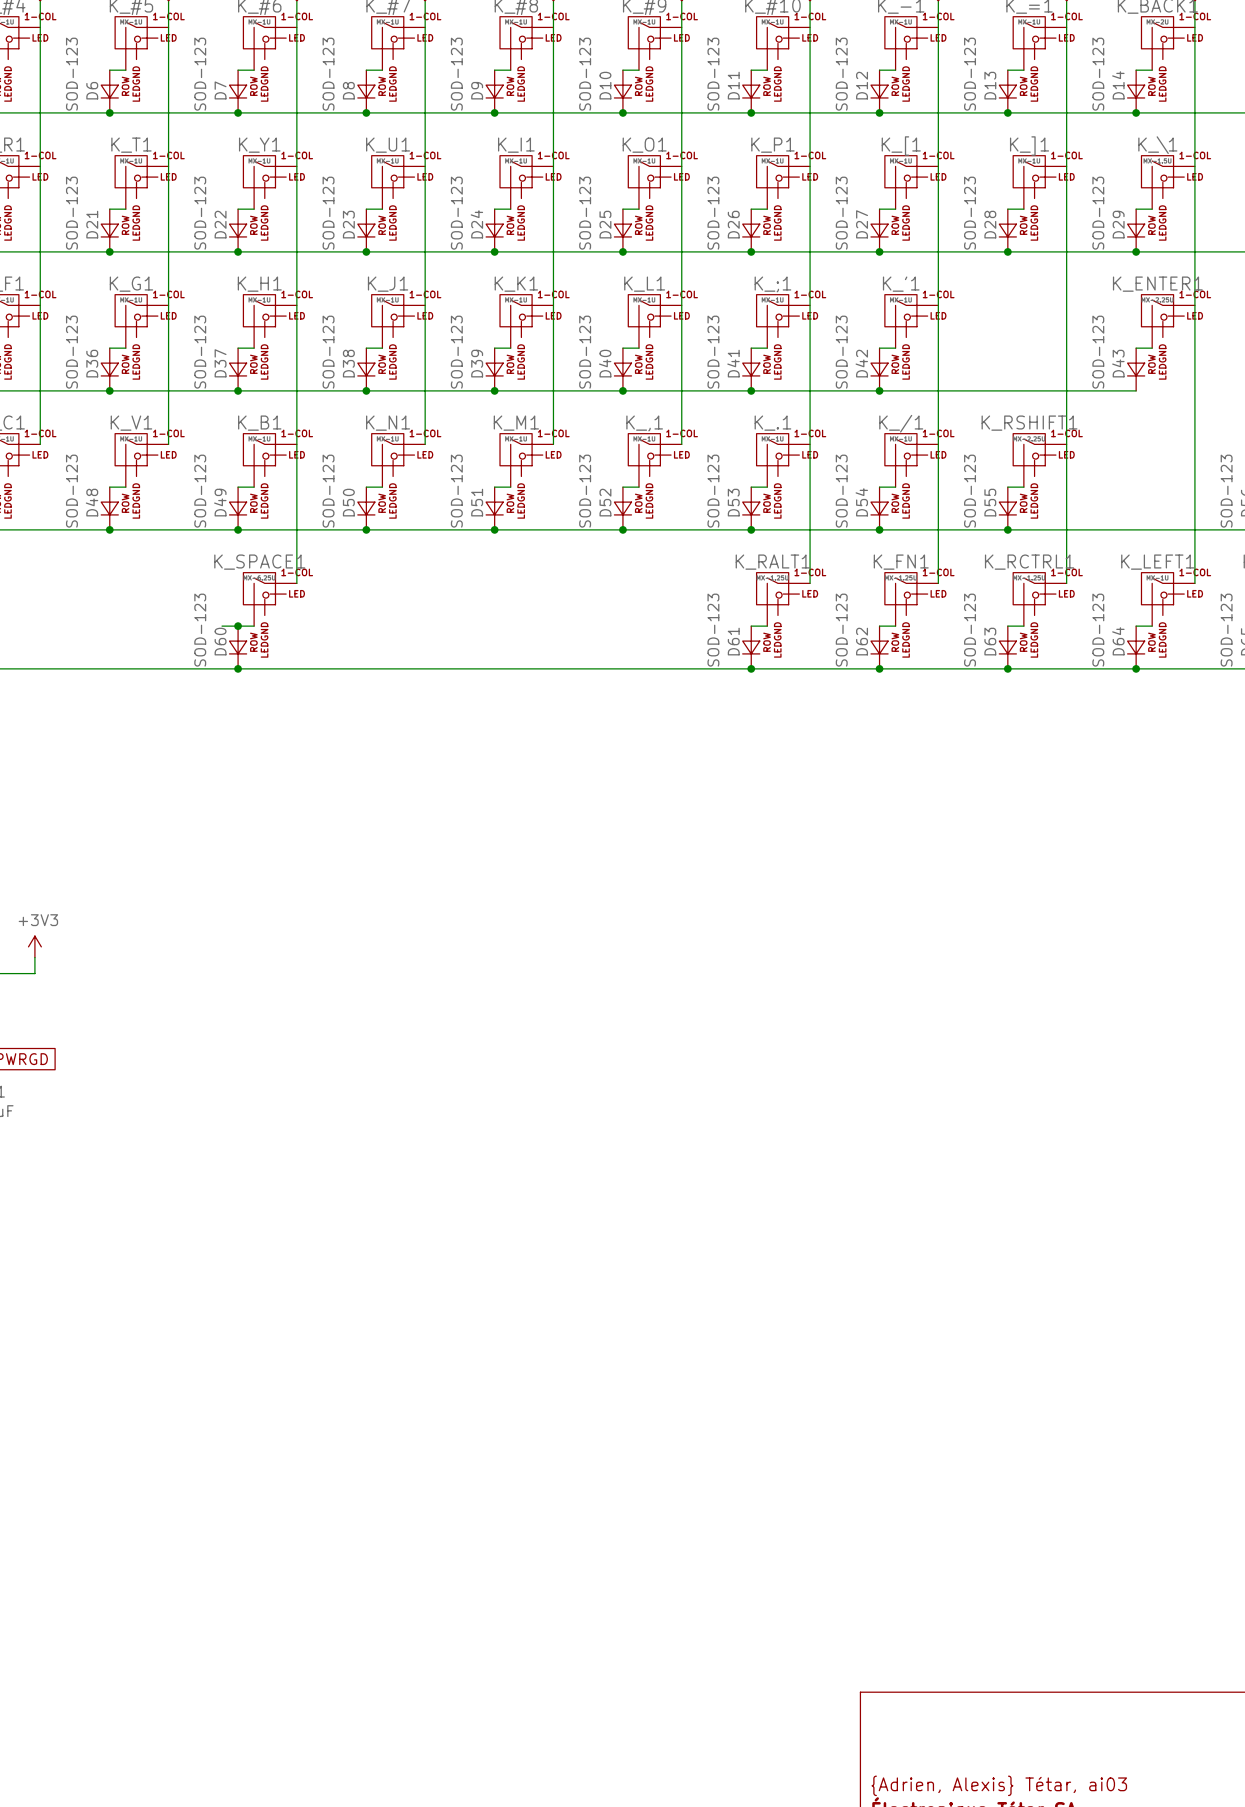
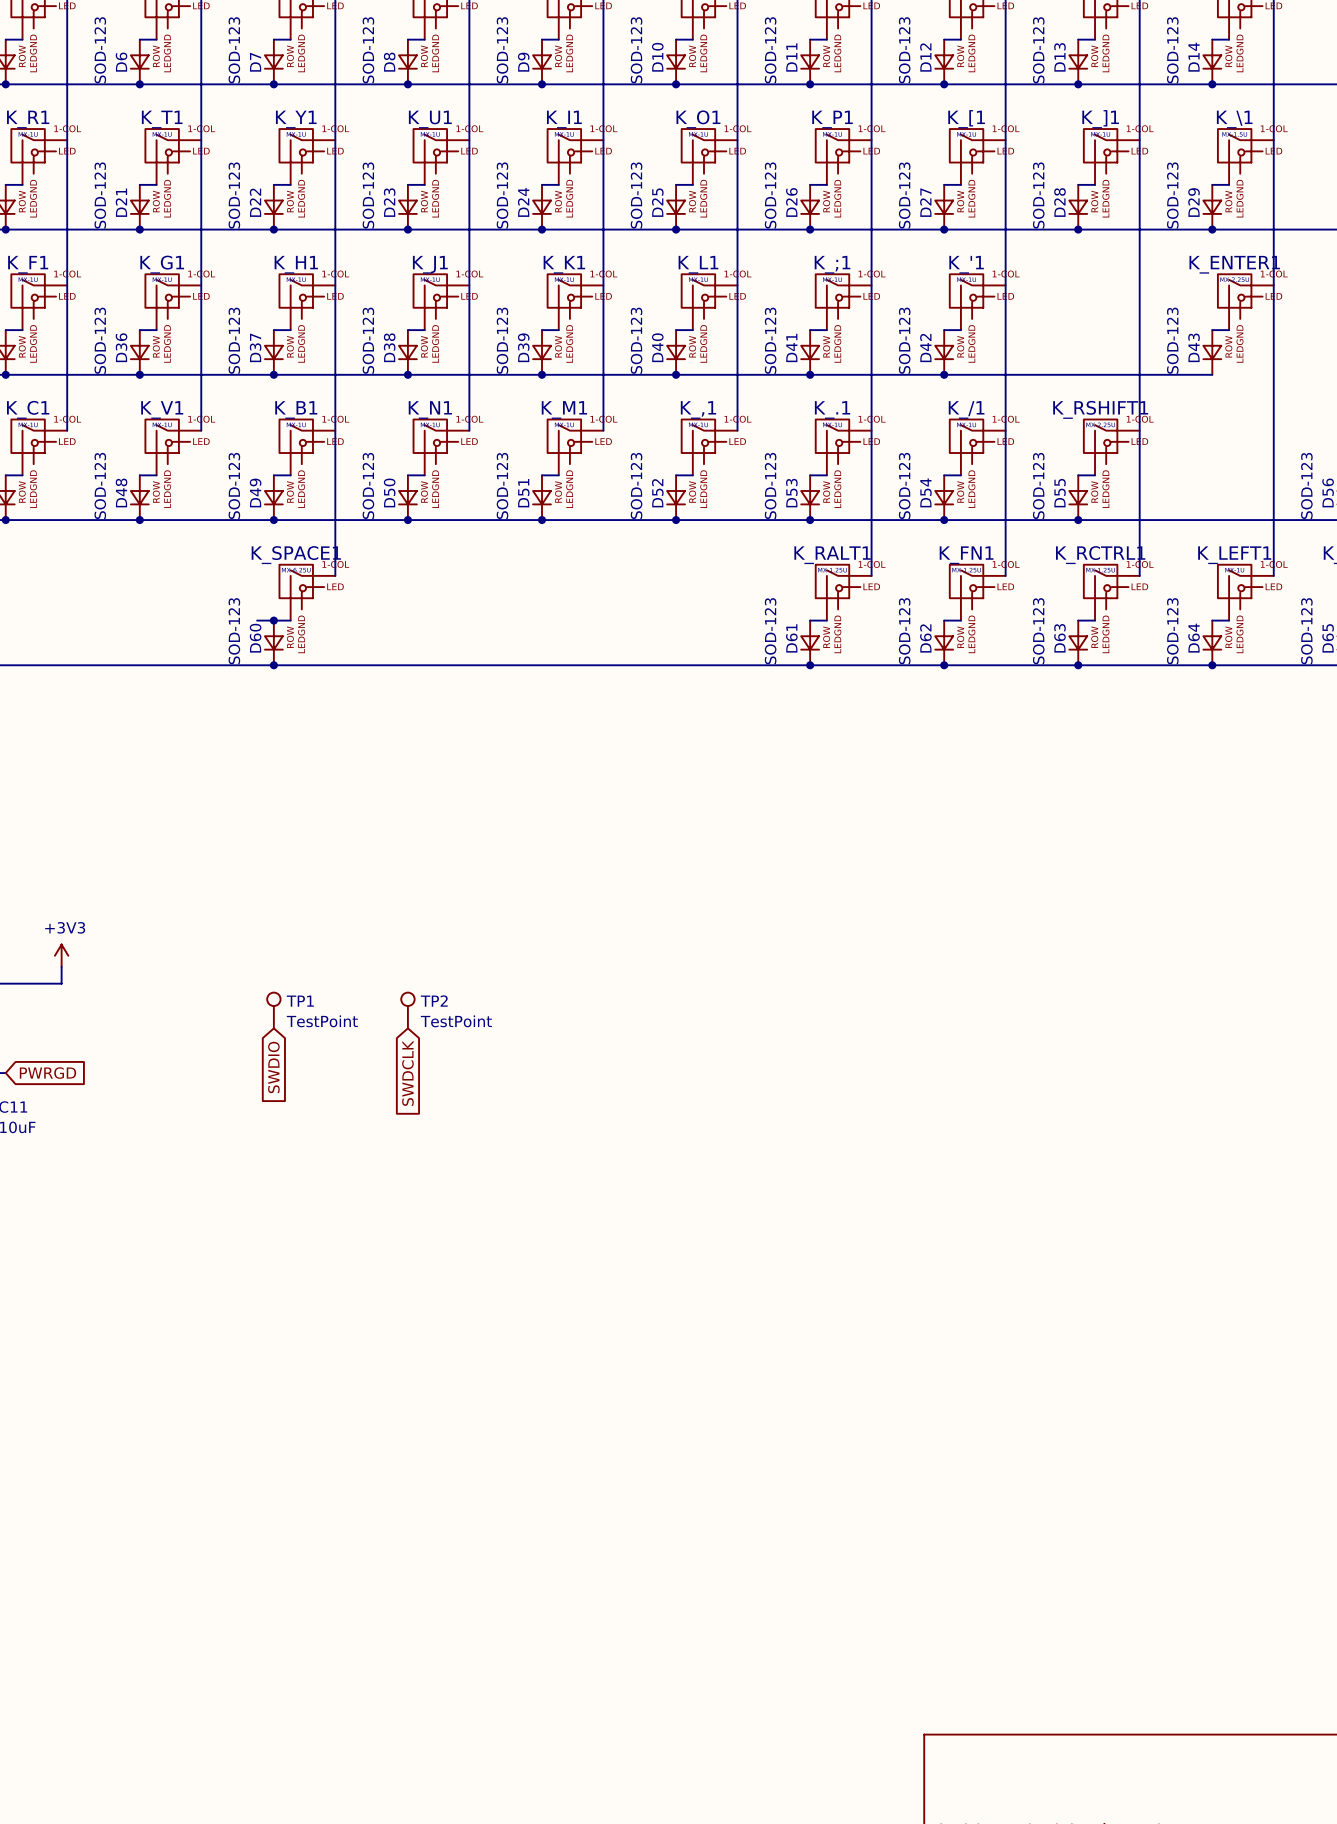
TP1: none -> TestPoint (273, 1010)
TP2: none -> TestPoint (407, 1010)
global label: none -> SWDIO (273, 1067)
global label: none -> SWDCLK (407, 1073)

